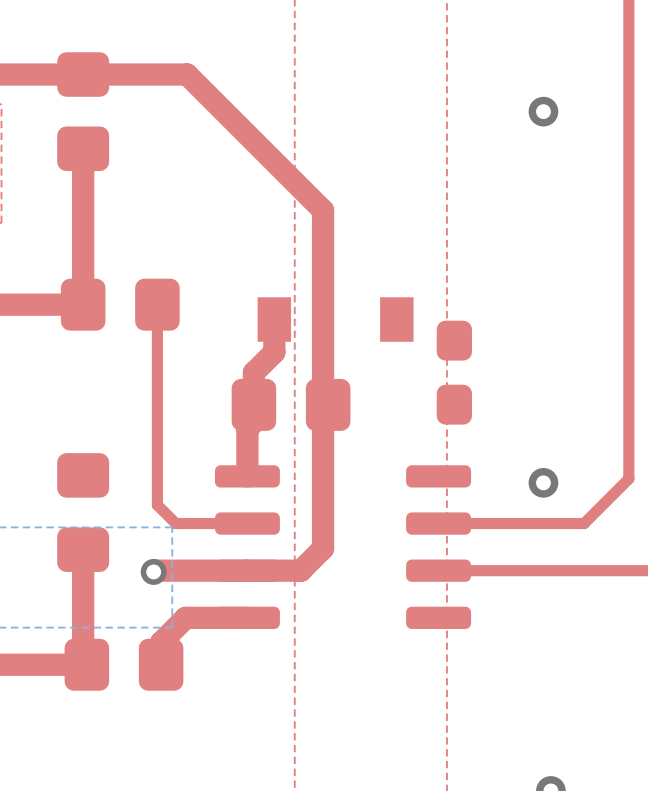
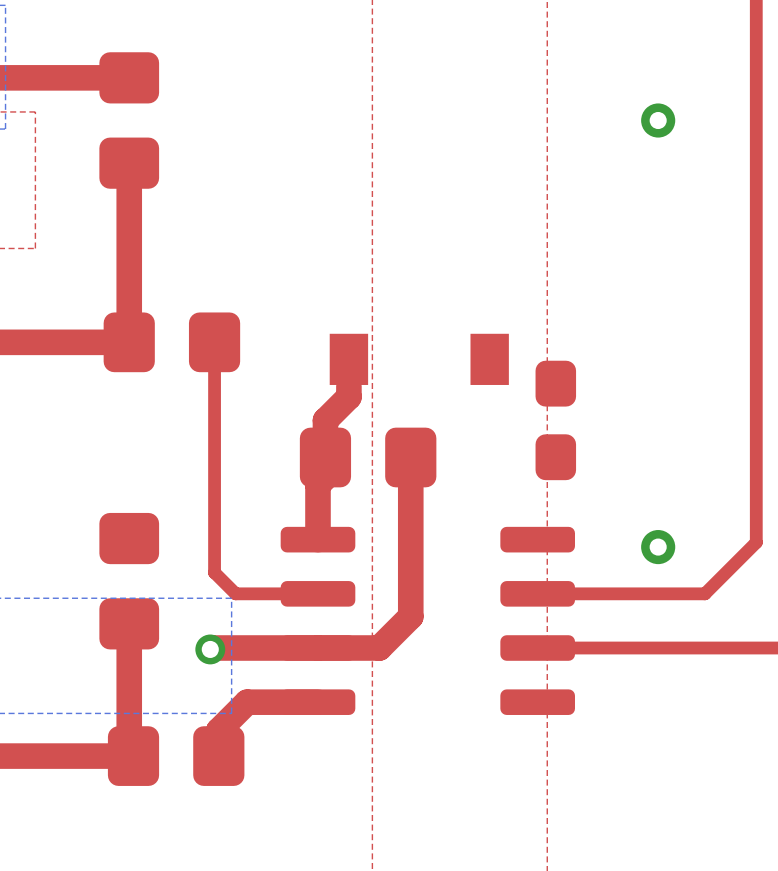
top track: (83, 74) (187, 74) (323, 210) (323, 548) -> (410, 457) (410, 616) (404, 622)

